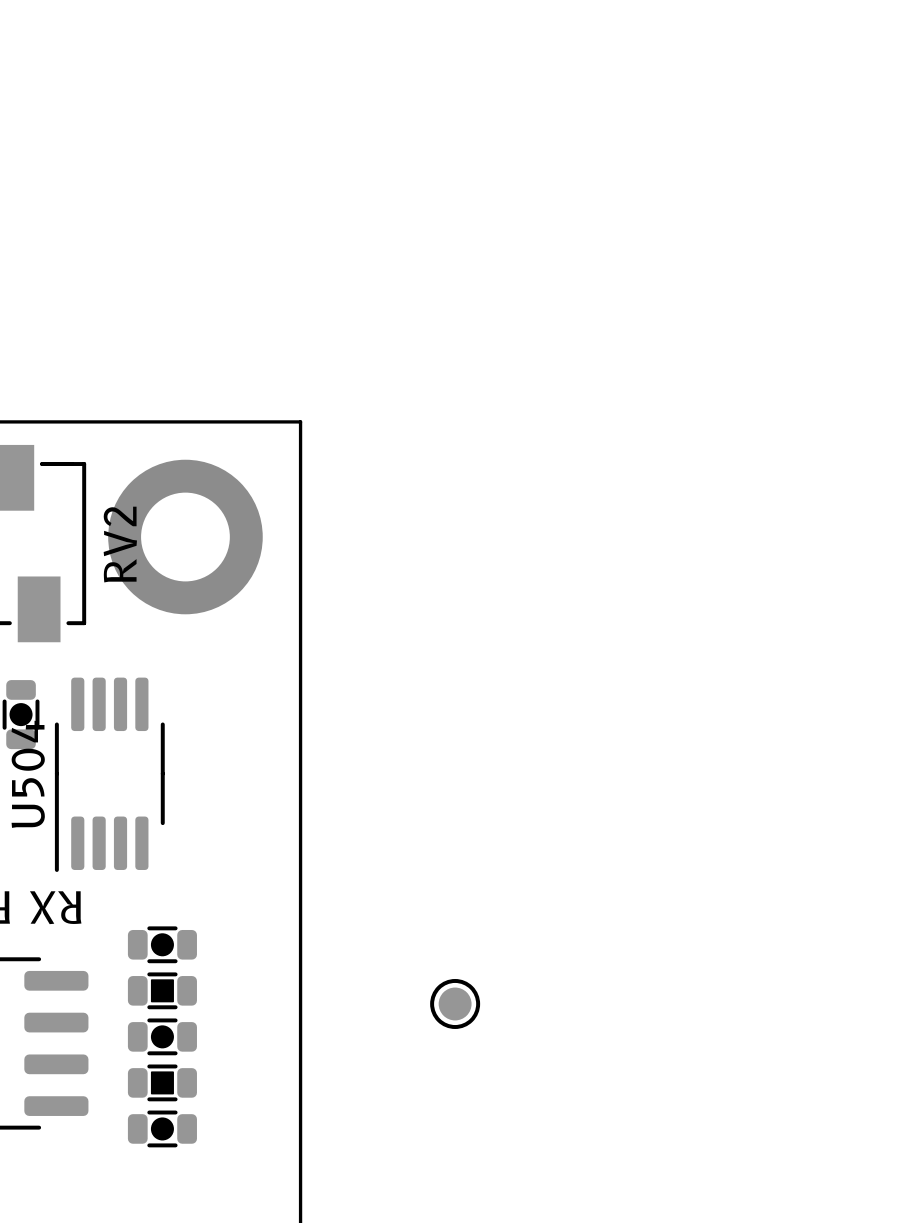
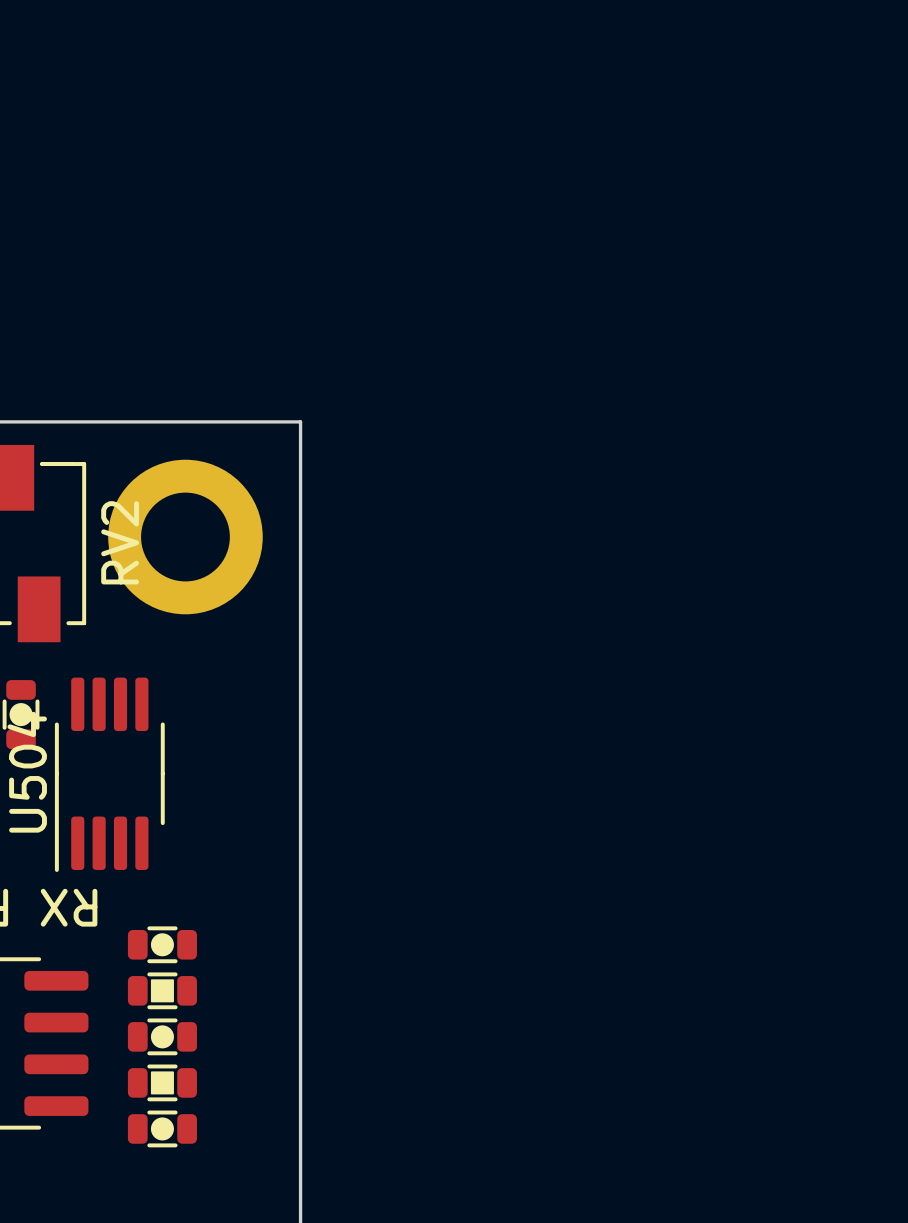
part: (455, 1003) -> none

